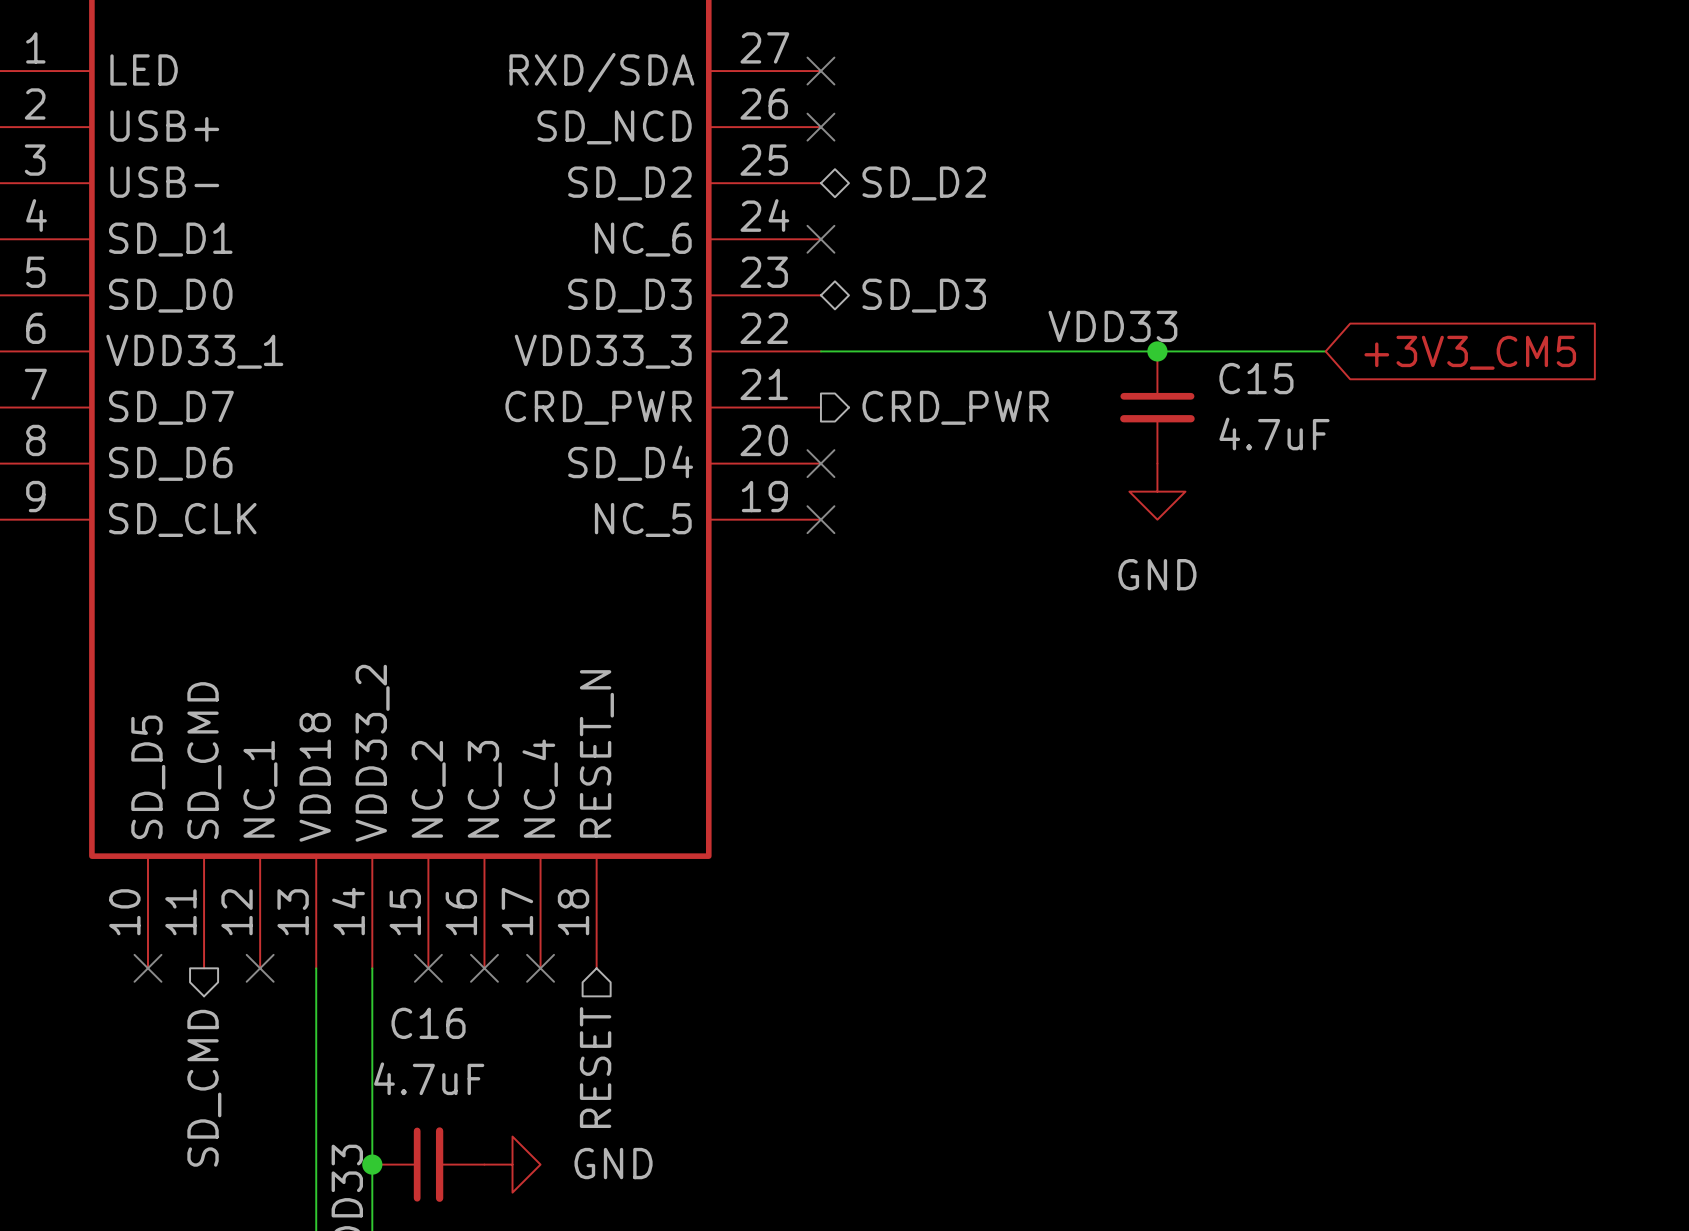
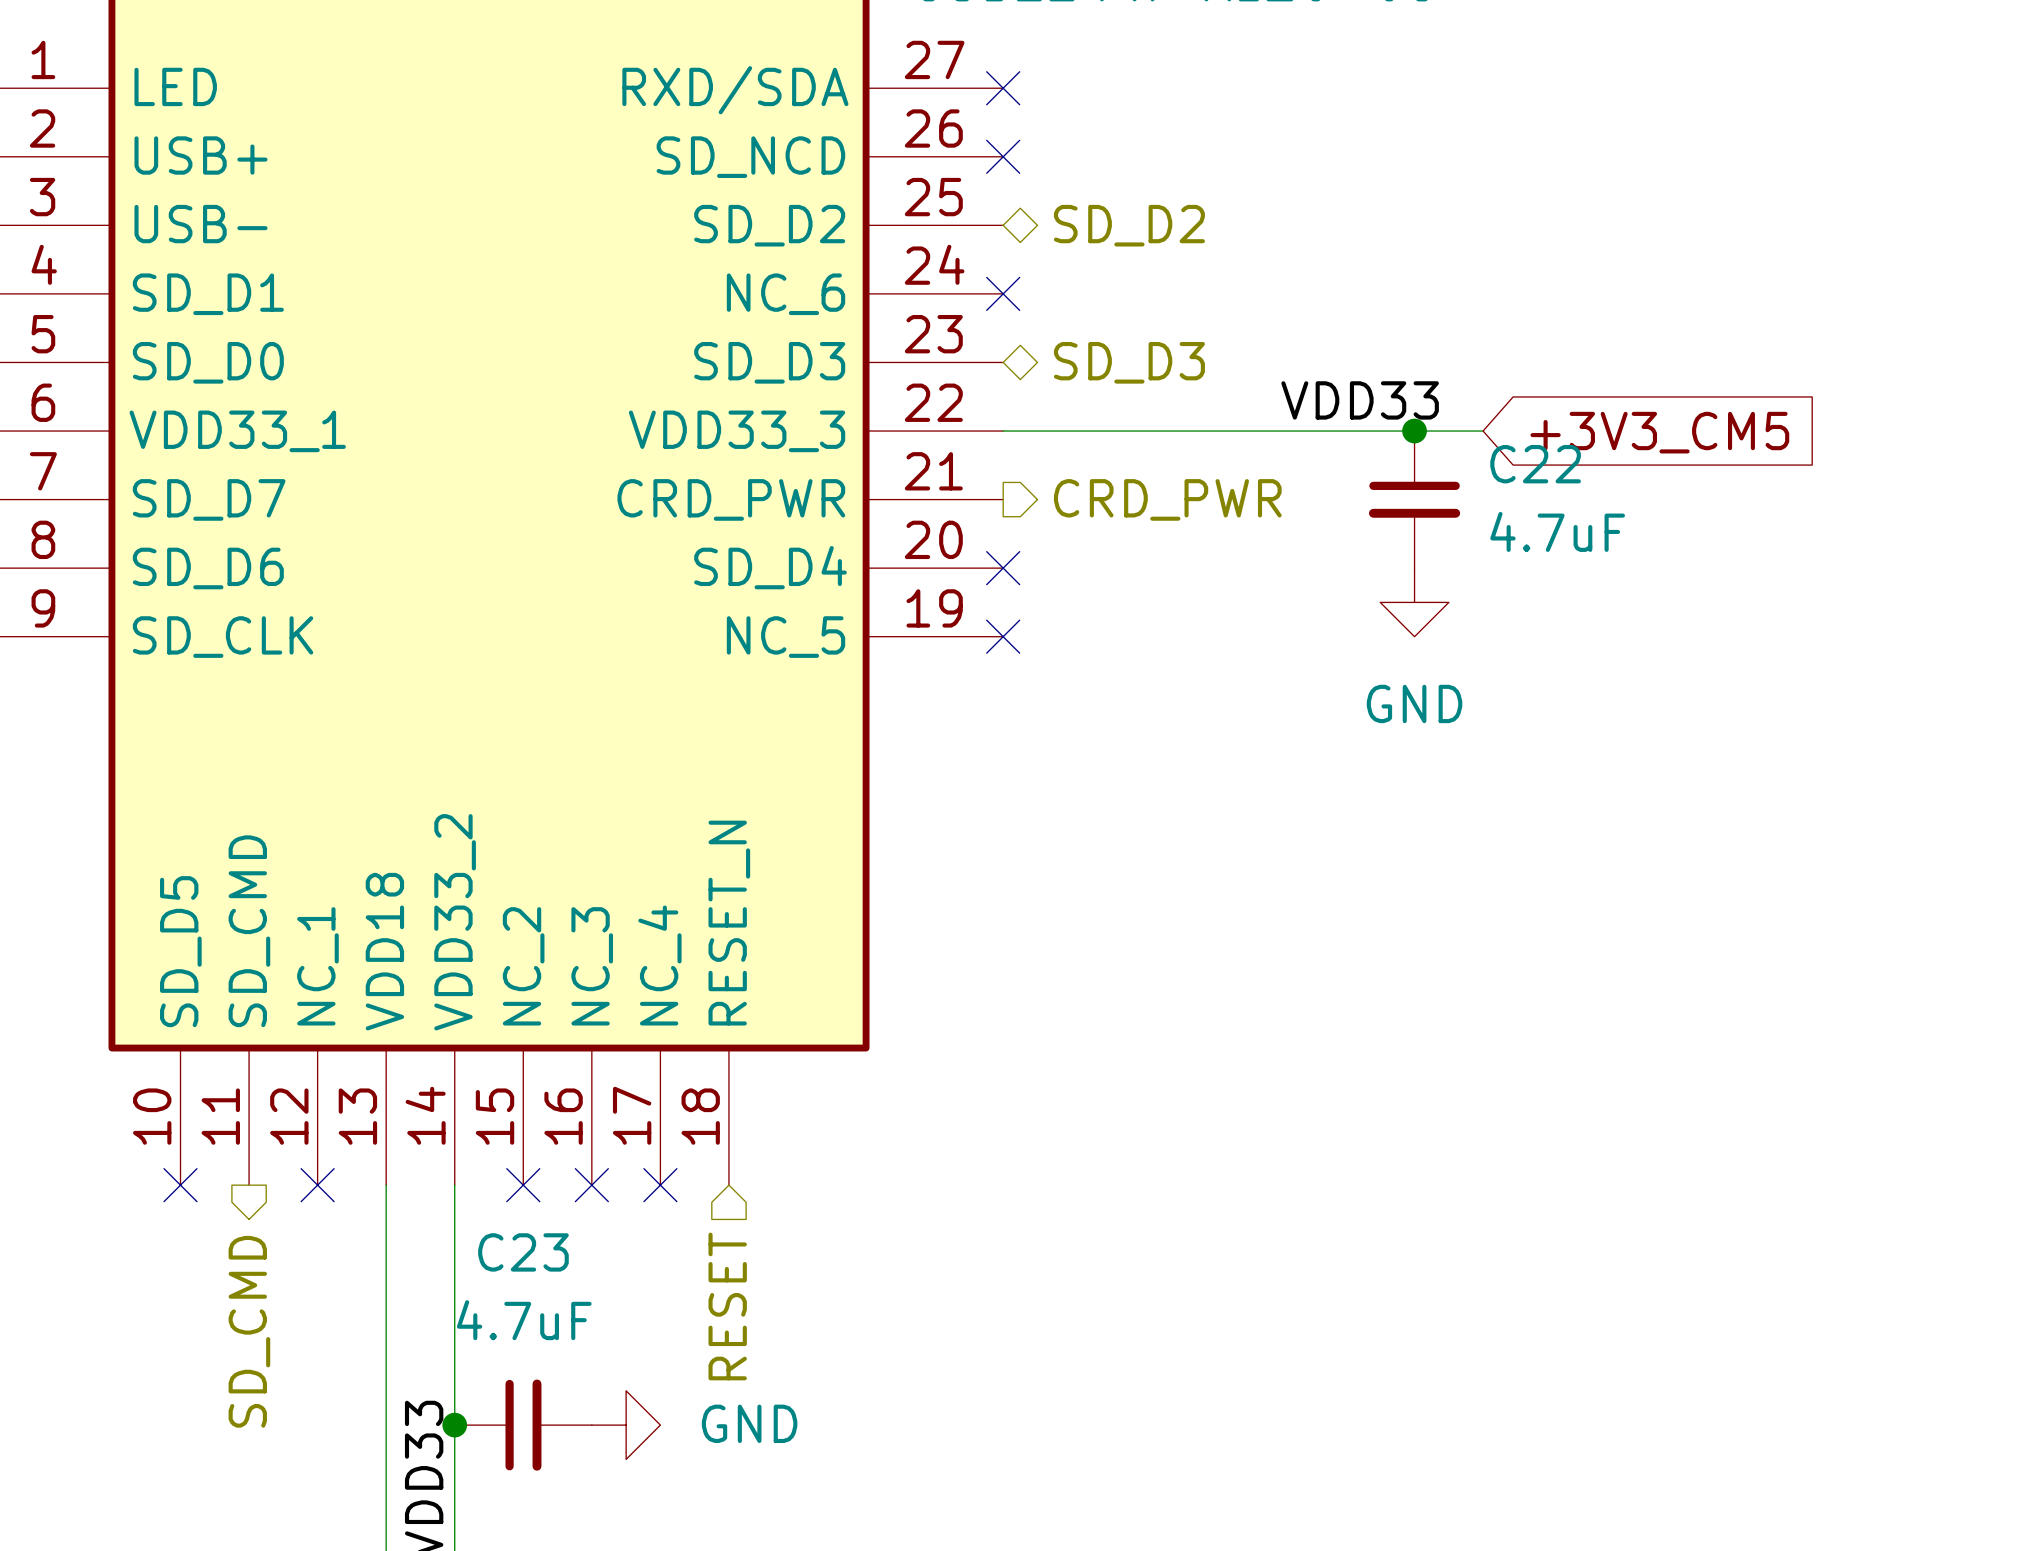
wire: (1213, 351) (1325, 351) -> none
global label position: +3V3_CM5 (1470, 352) -> +3V3_CM5 (1659, 432)
C15 name: C15 (1256, 378) -> C22 (1535, 464)
C16 name: C16 (428, 1023) -> C23 (523, 1252)

